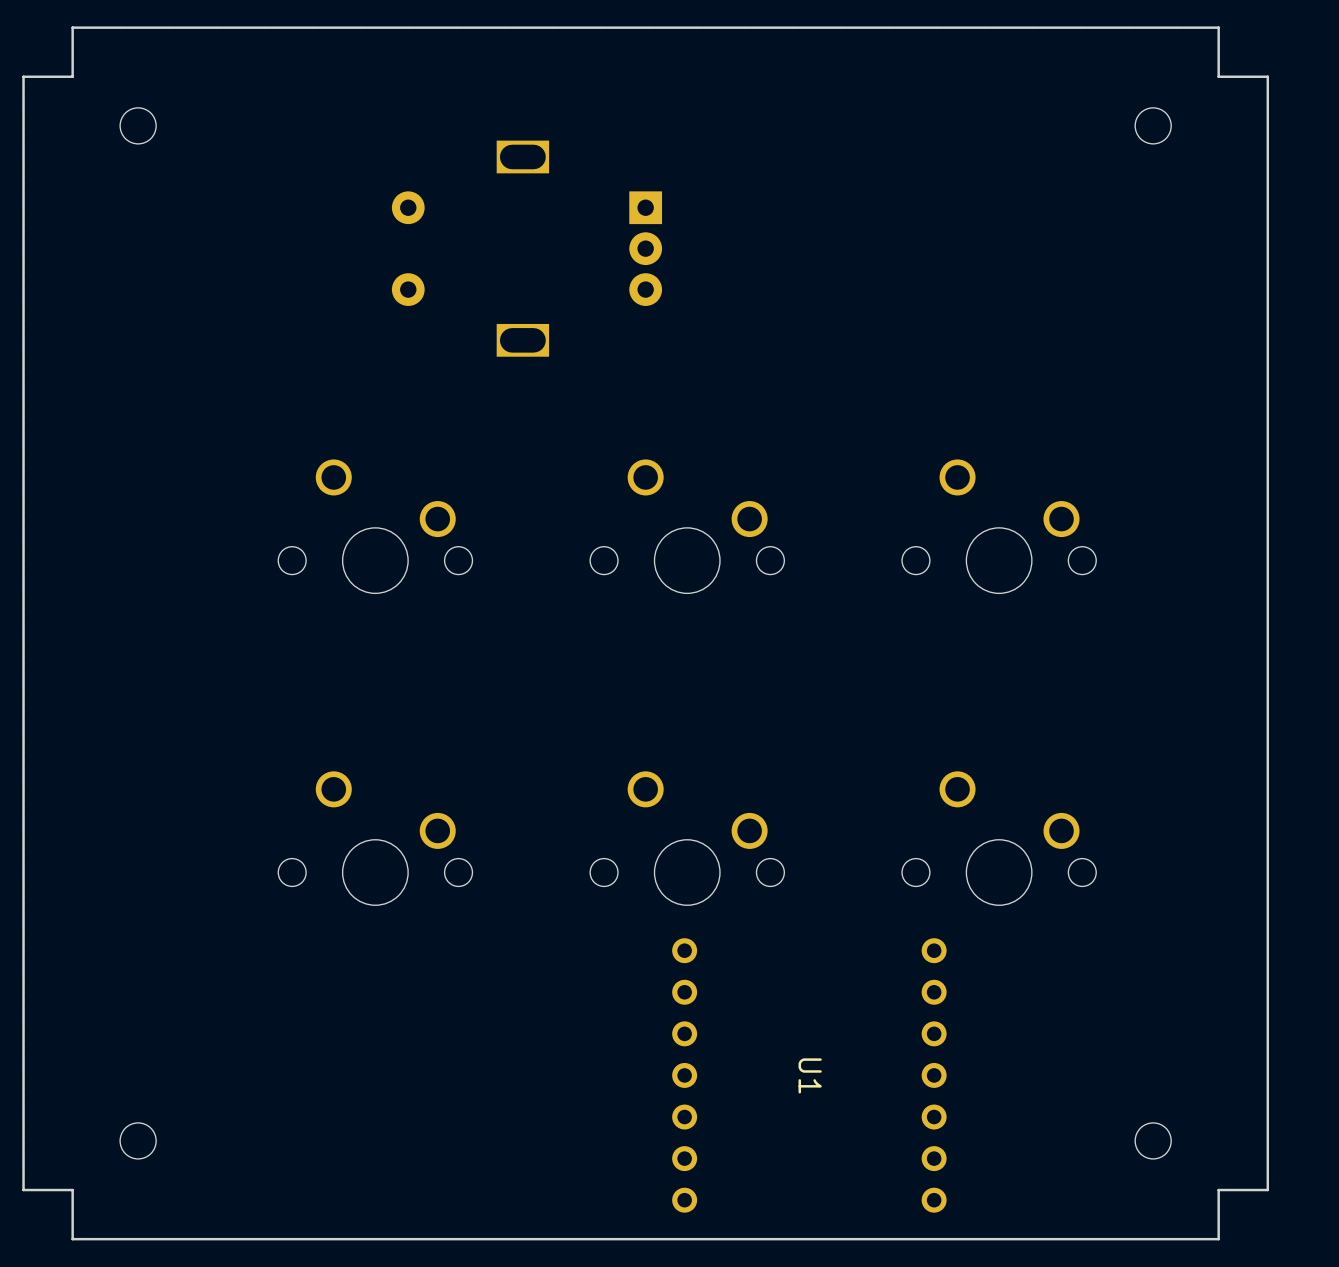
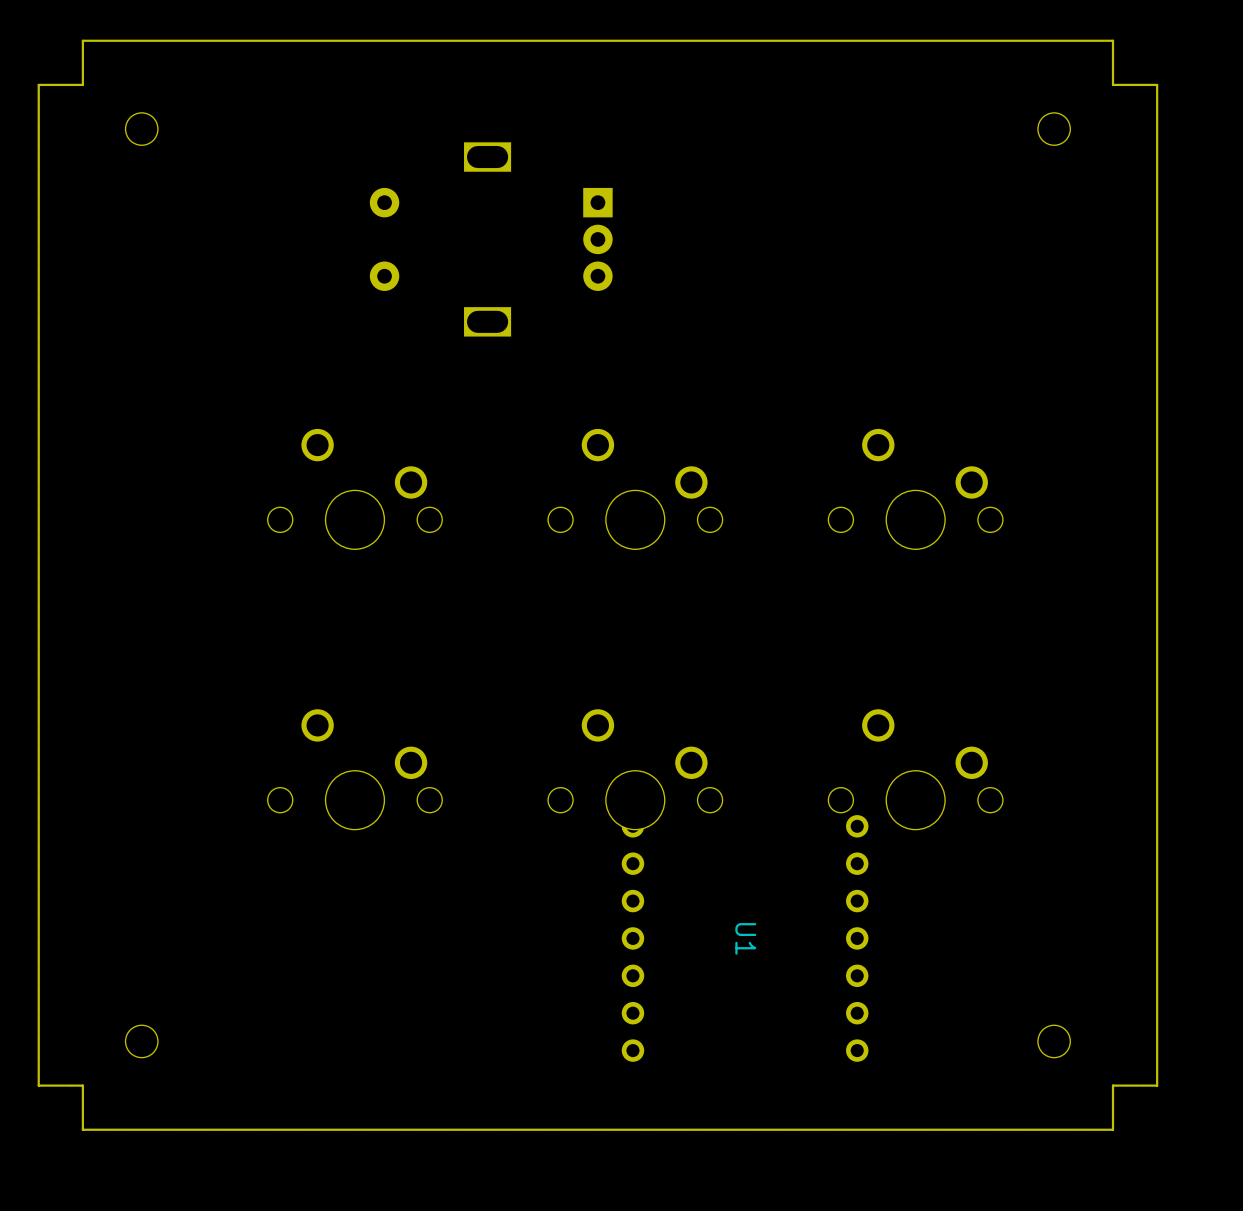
U1 position: (809, 1075) -> (745, 938)

